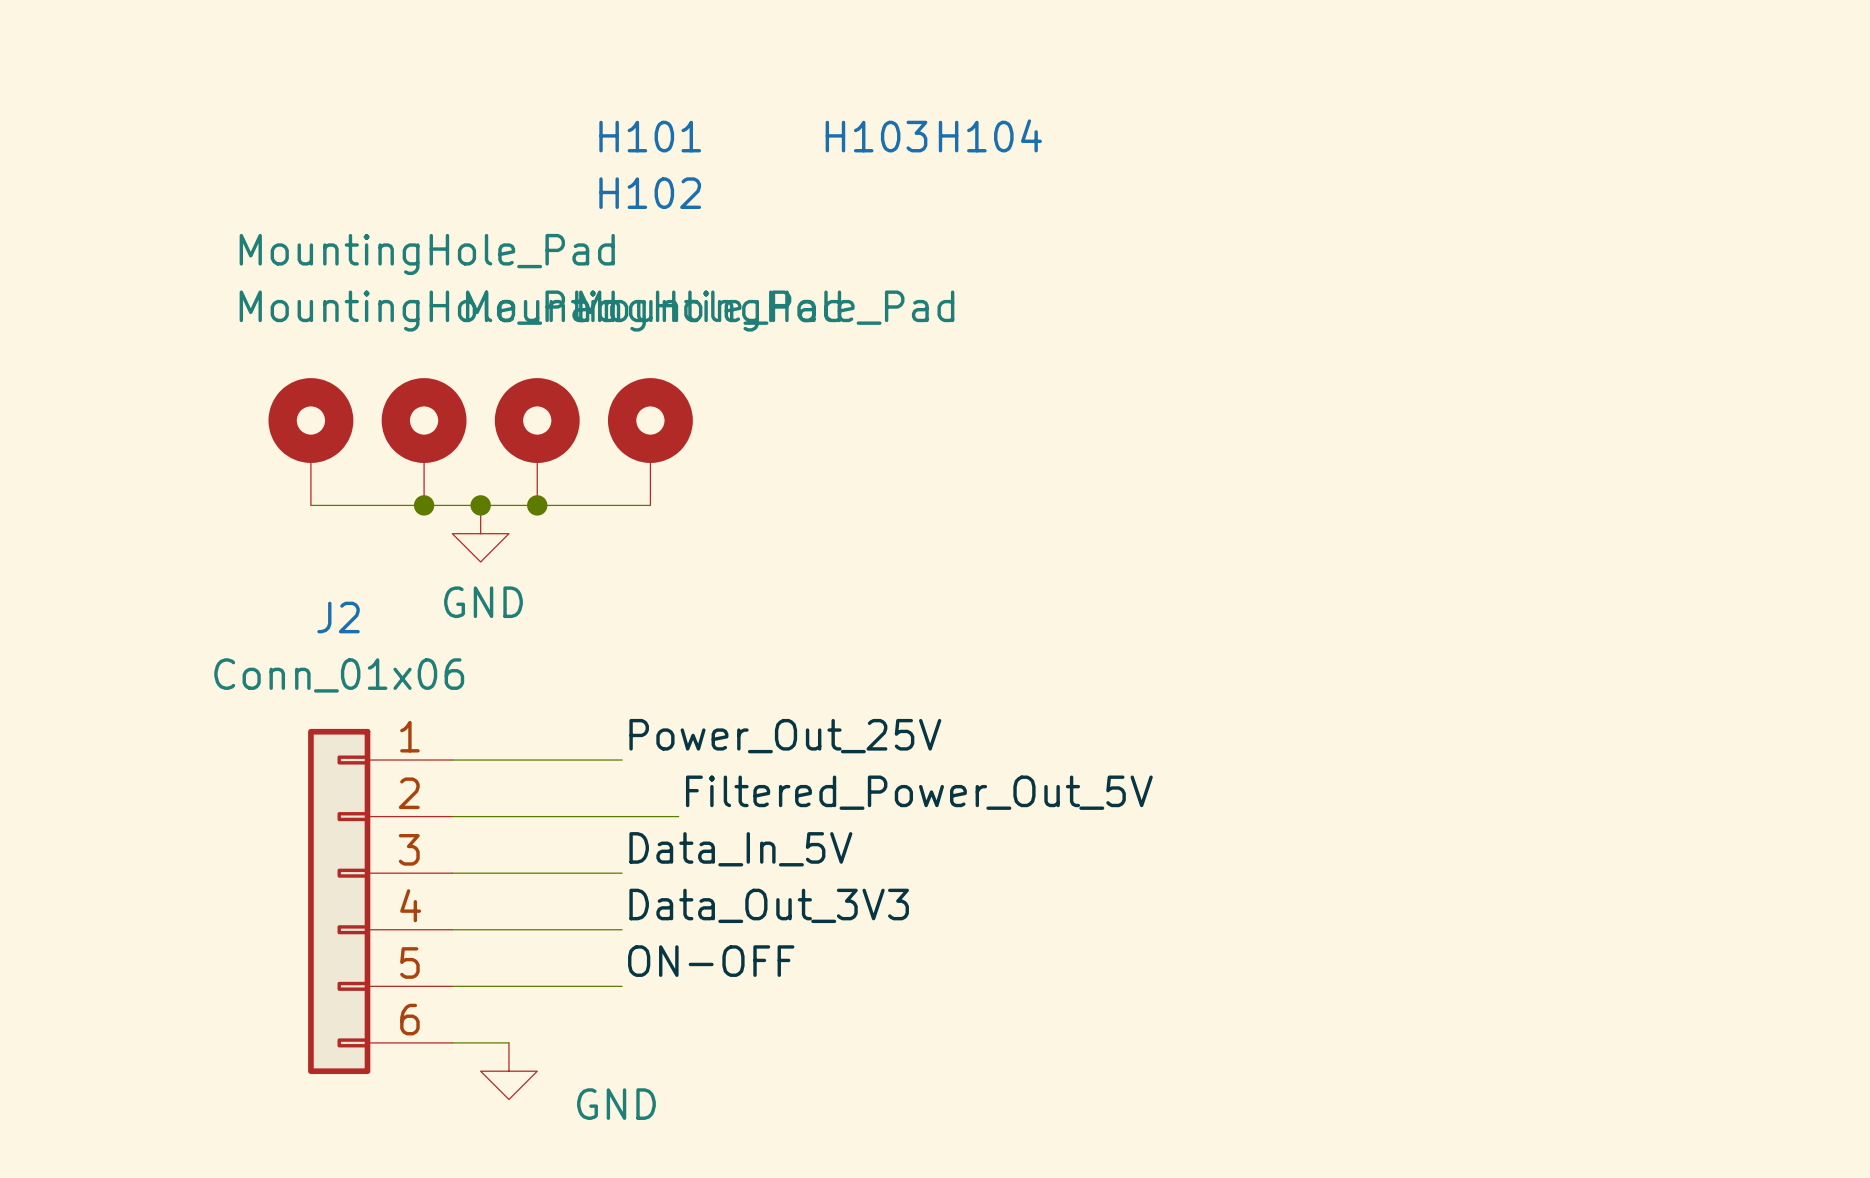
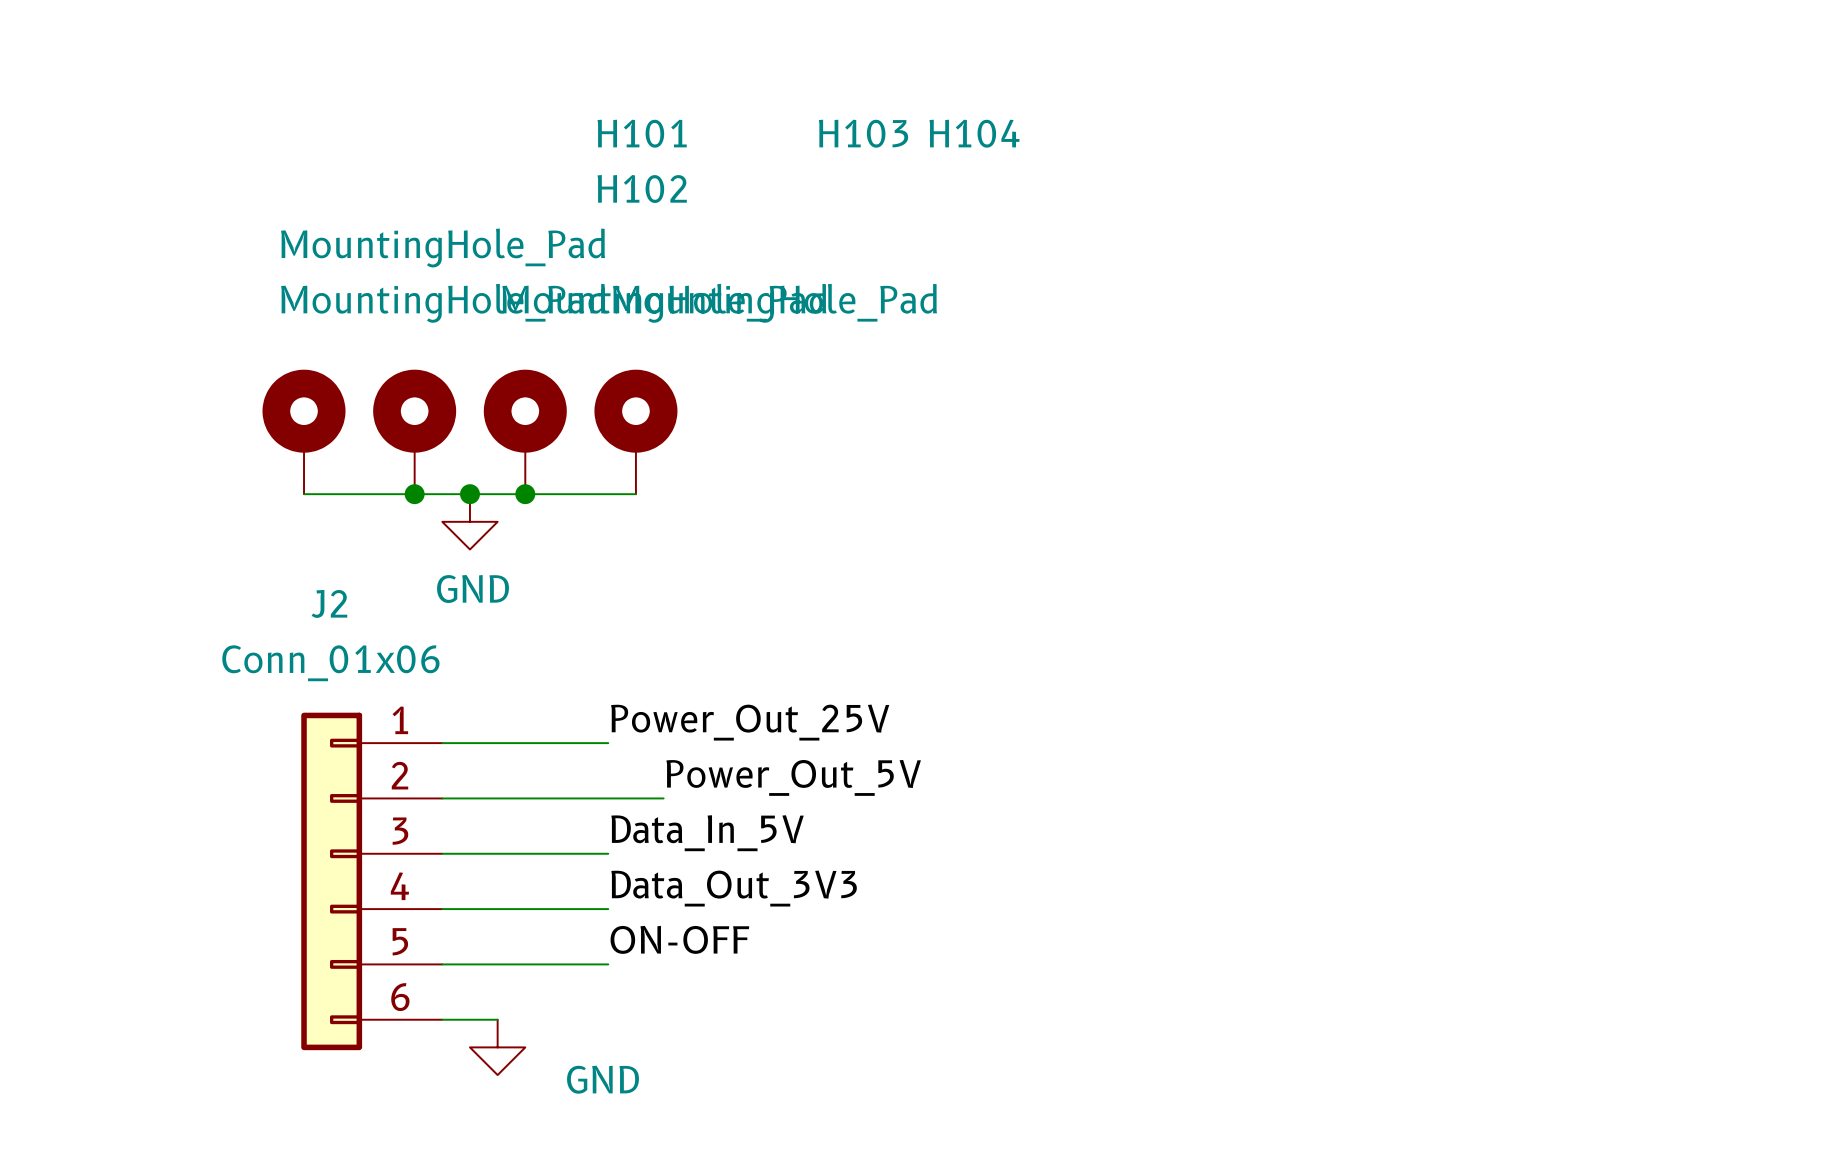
label: Filtered_Power_Out_5V (919, 792) -> Power_Out_5V (793, 777)

